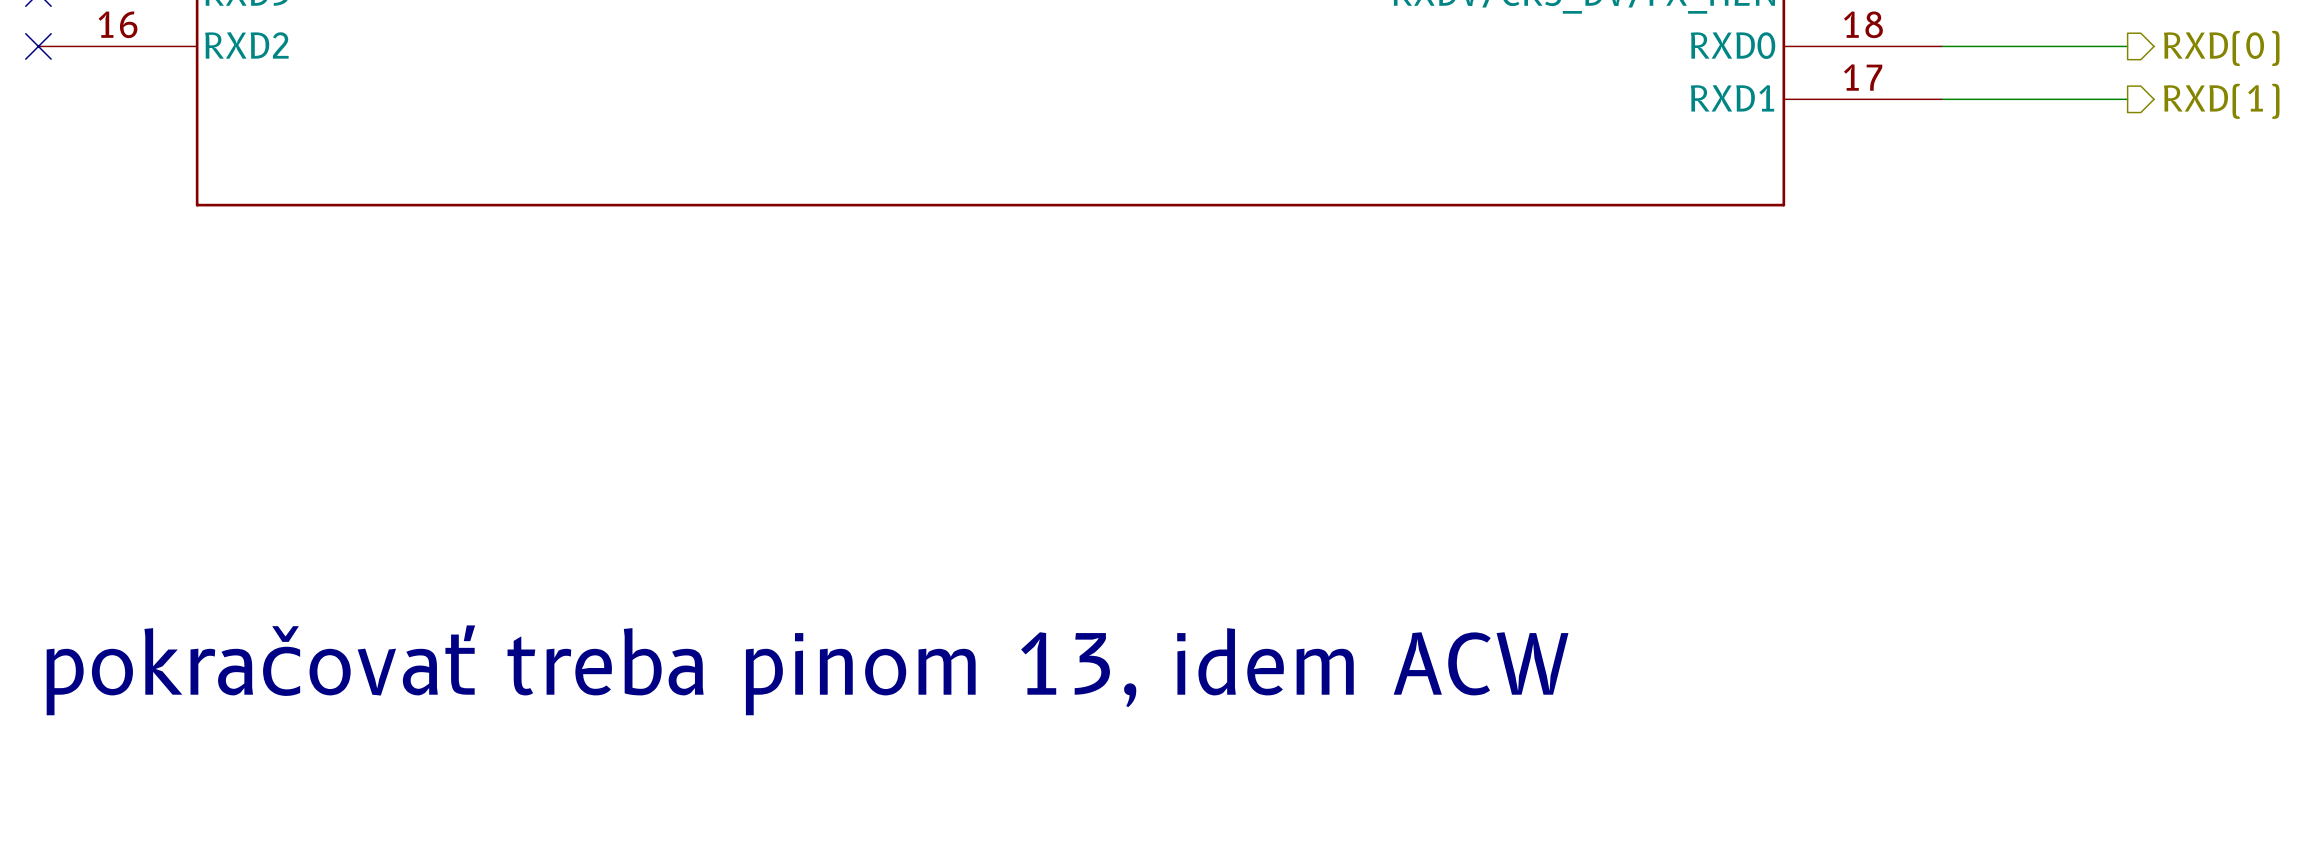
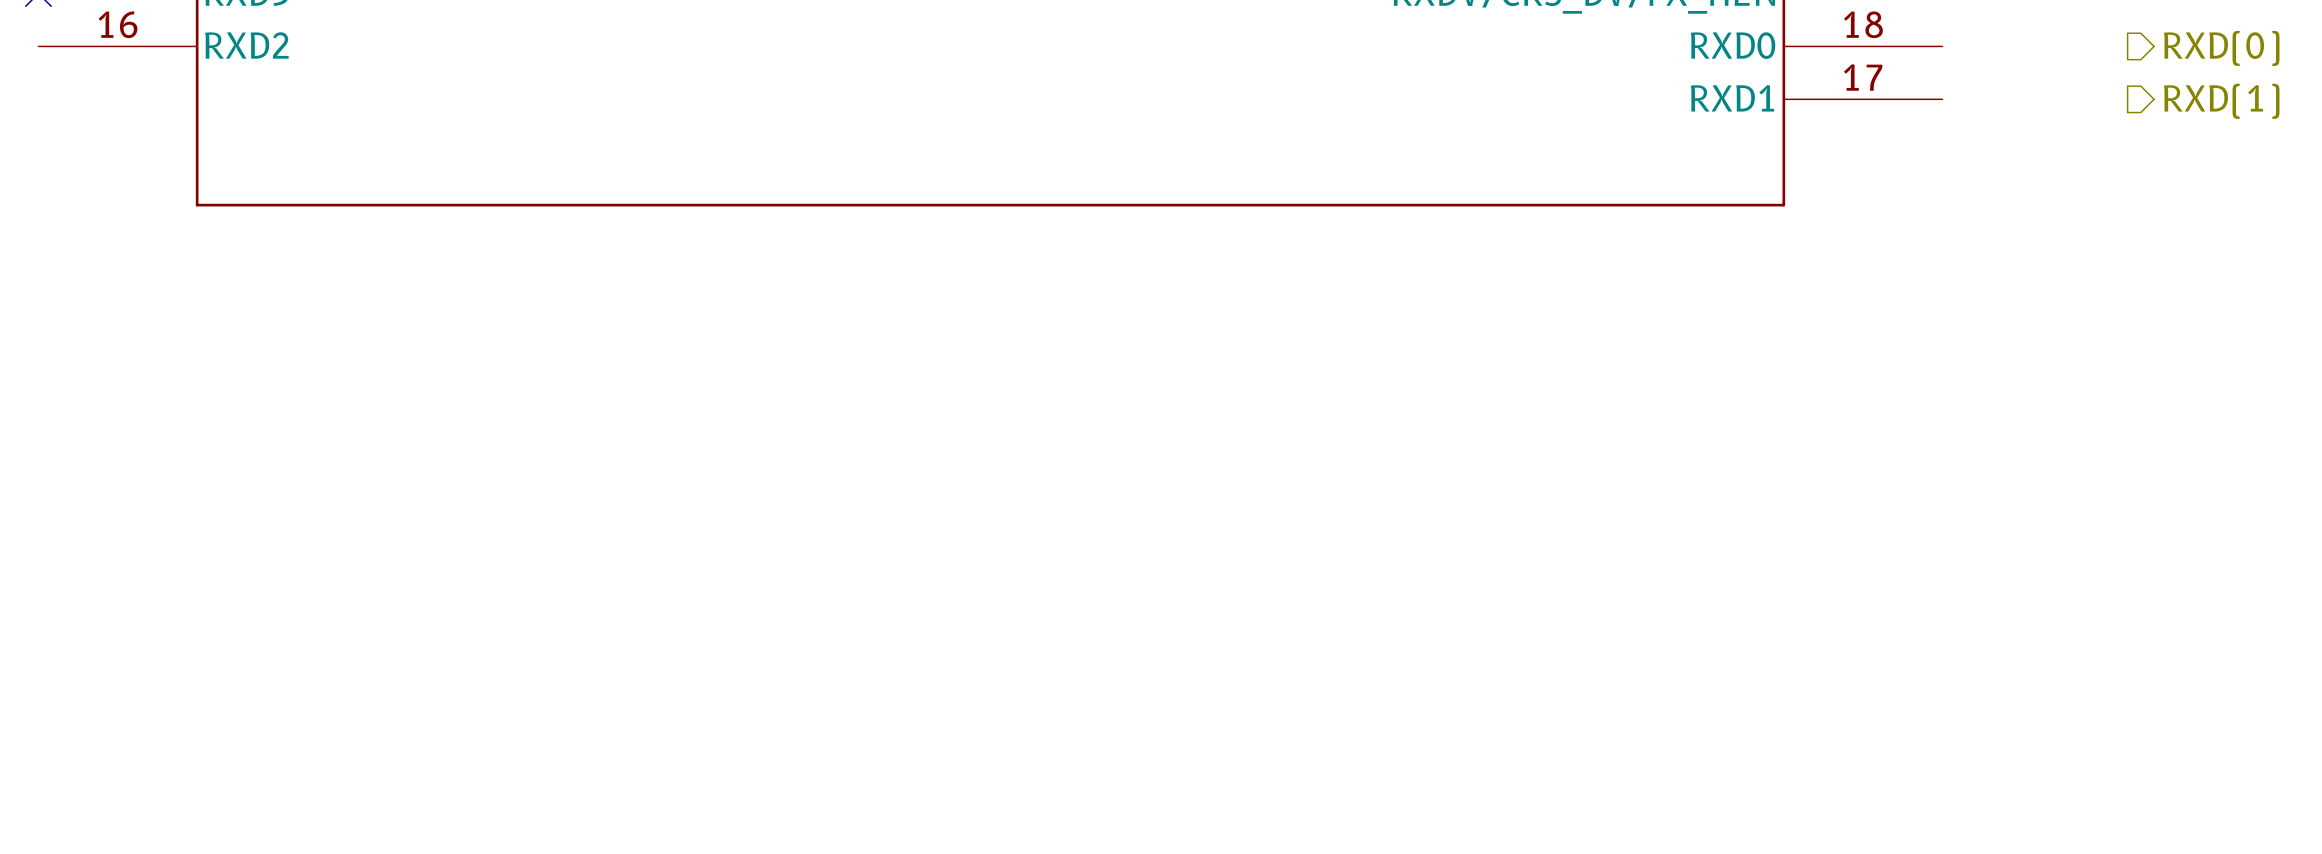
no-connect mark: (38, 46) -> none
wire: (1942, 46) (2127, 46) -> none
wire: (1942, 99) (2127, 99) -> none
text: pokračovať treba pinom 13, idem ACW (807, 670) -> none

